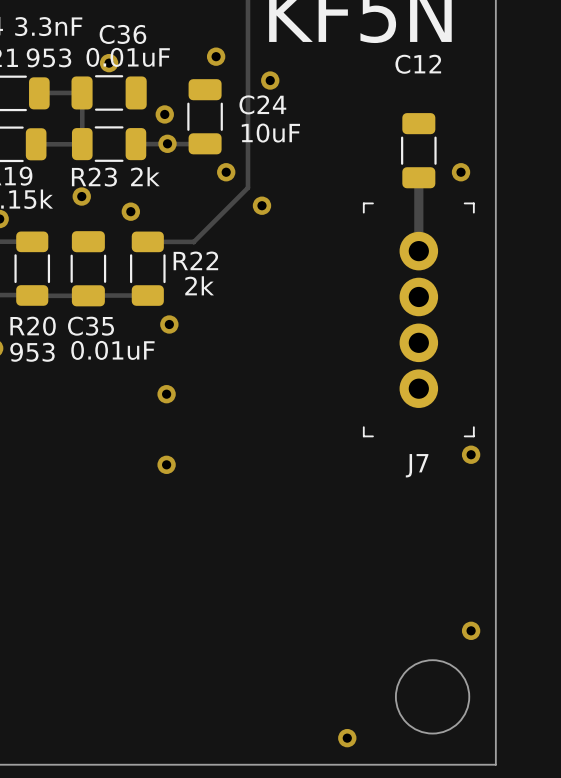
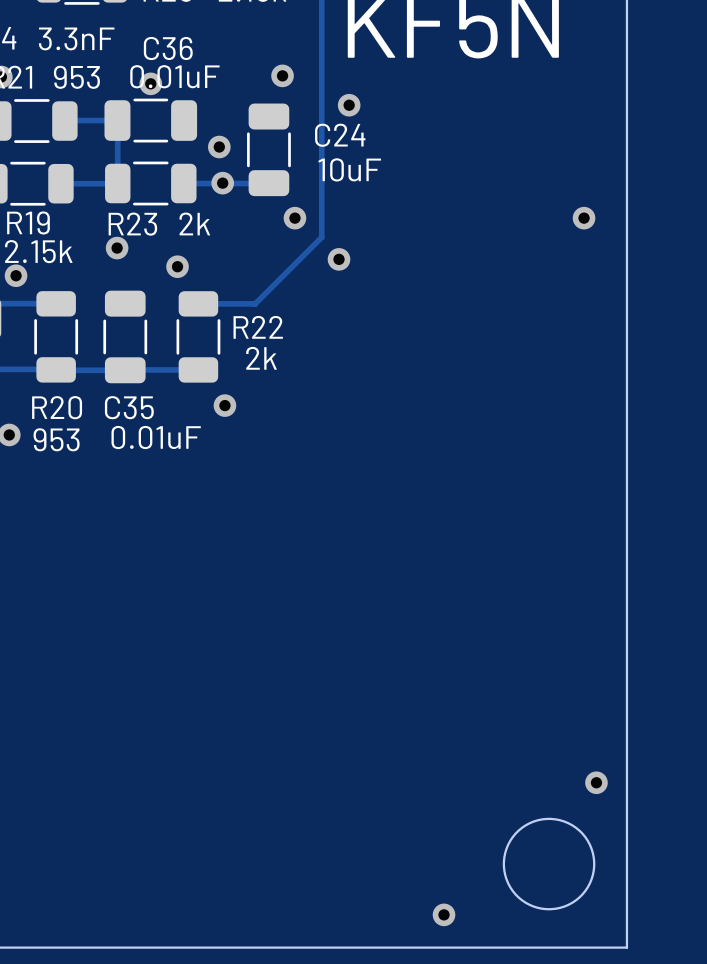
C12: (418, 150) -> none
track: (418, 177) (418, 251) -> none
J7: (418, 319) -> none
via: (166, 394) -> none
via: (471, 454) -> none
via: (166, 464) -> none

